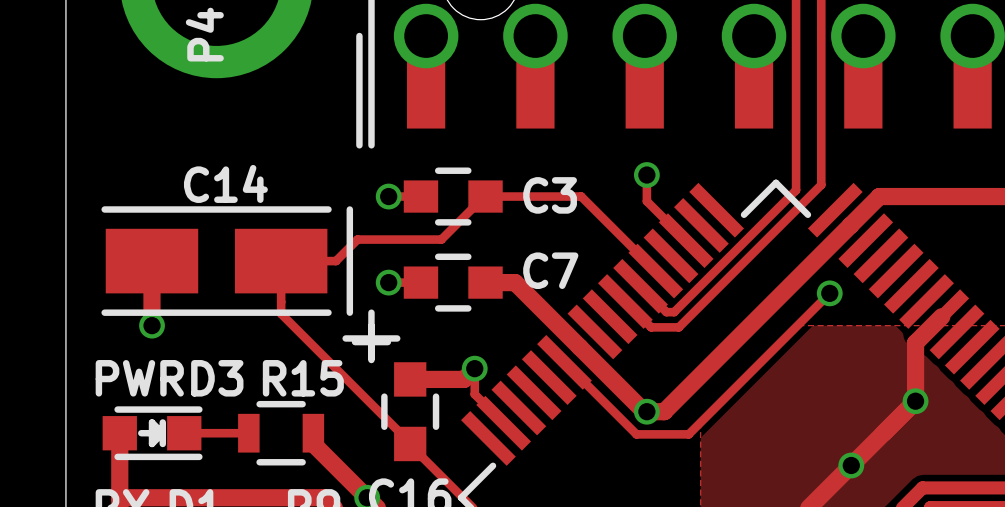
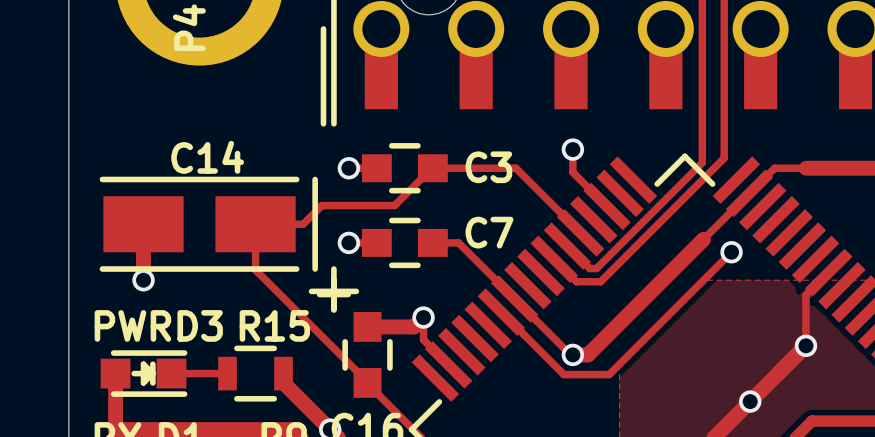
track width: thick (915, 196) (879, 196) (797, 278) -> thin (806, 168) (774, 168) (703, 239)
track width: thick (485, 282) (515, 282) (644, 411) -> thin (432, 242) (458, 242) (570, 354)
track width: thick (941, 316) (915, 342) (915, 401) -> thin (828, 272) (805, 295) (805, 345)

